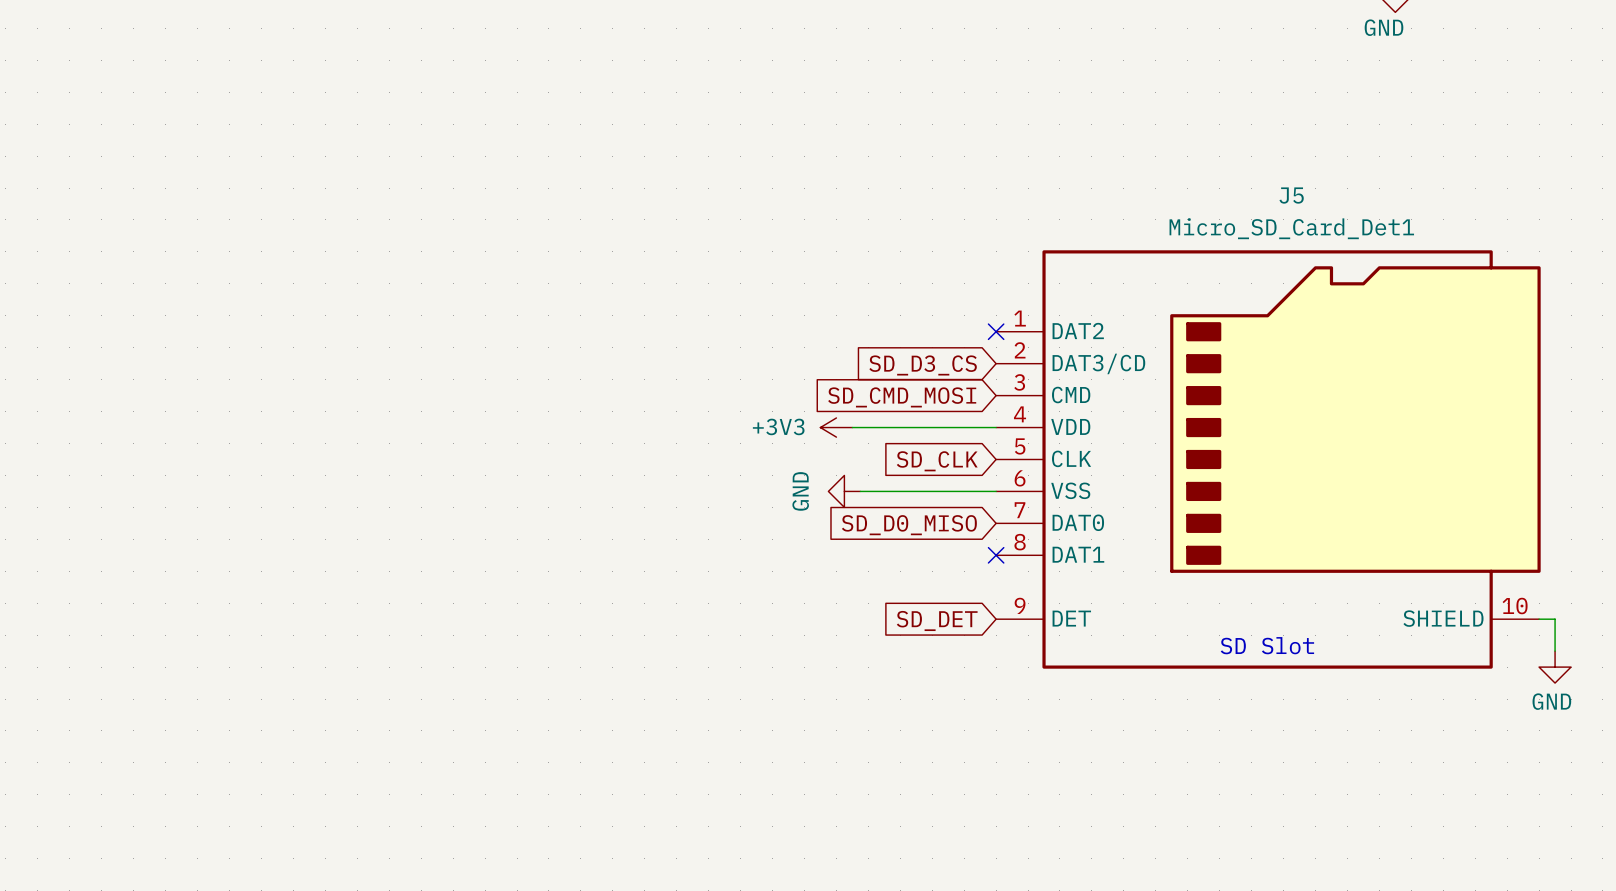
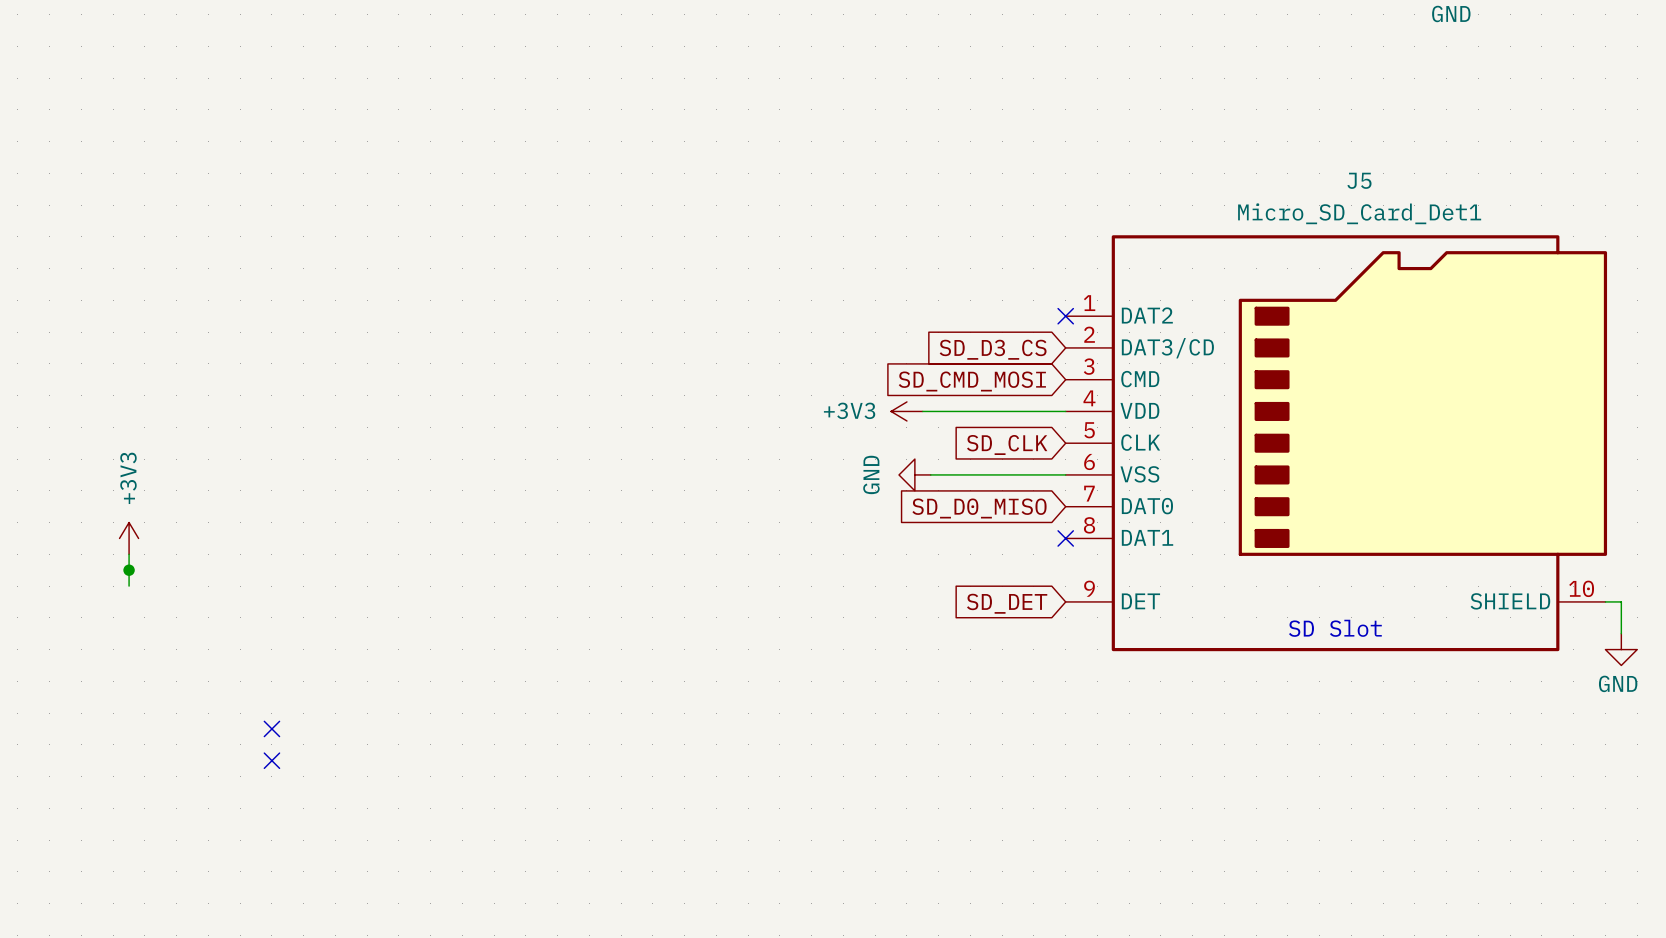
power symbol: none -> +3V3 (129, 538)
wire: none -> (129, 554) (129, 586)
junction: none -> (129, 570)
no-connect mark: none -> (271, 728)
no-connect mark: none -> (271, 760)

